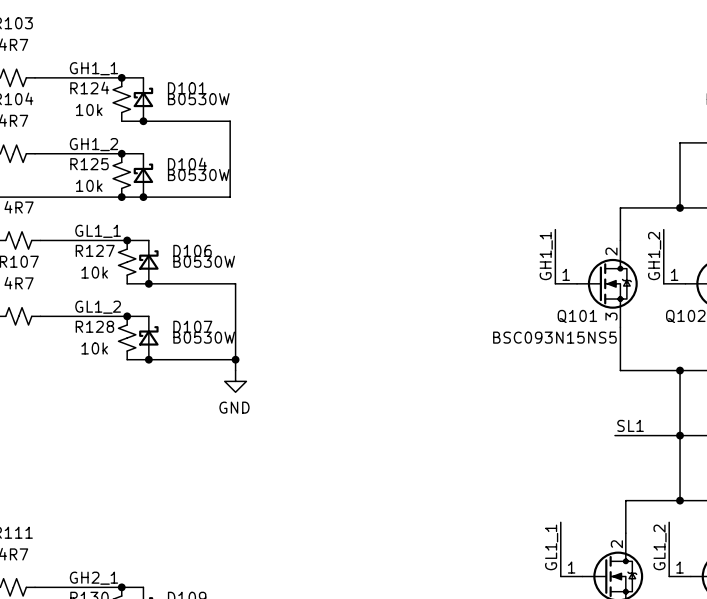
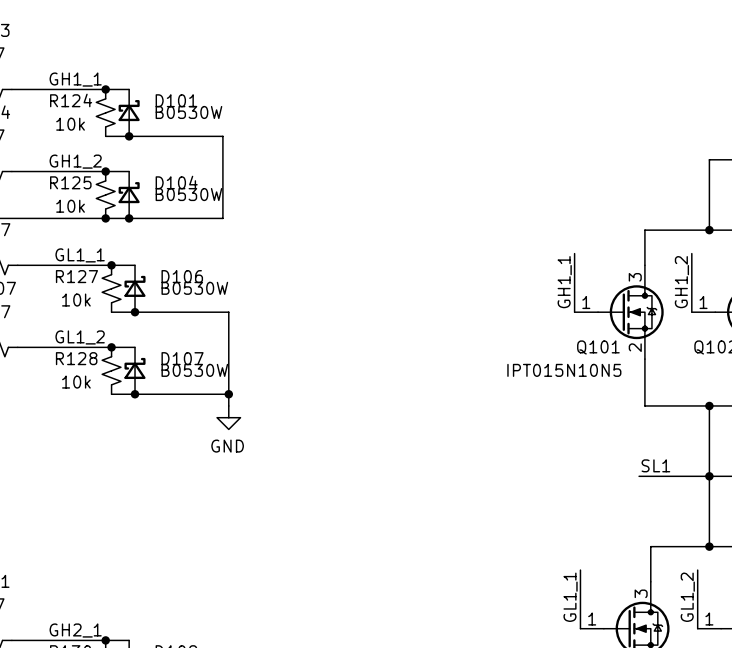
Q101 pin number: 2 (611, 251) -> 3 (635, 277)
Q101 pin number: 3 (611, 316) -> 2 (635, 347)
Q101 value: BSC093N15NS5 (554, 337) -> IPT015N10N5 (564, 370)
part pin number: 2 (616, 544) -> 3 (641, 593)

